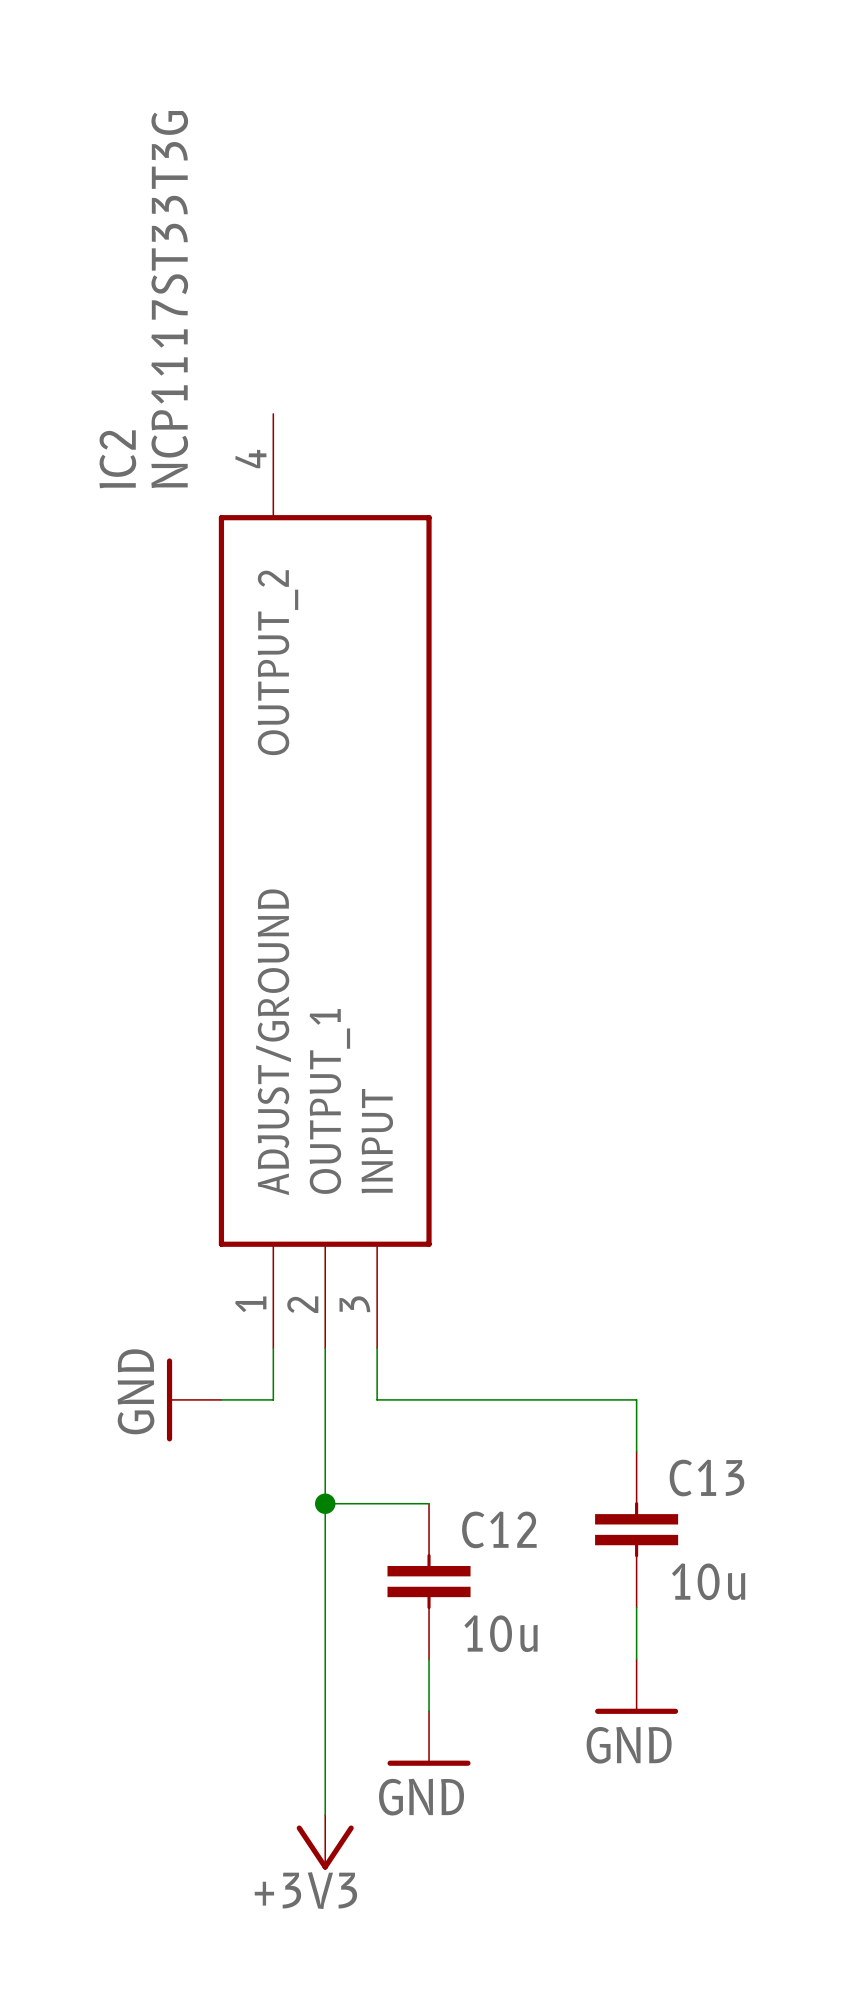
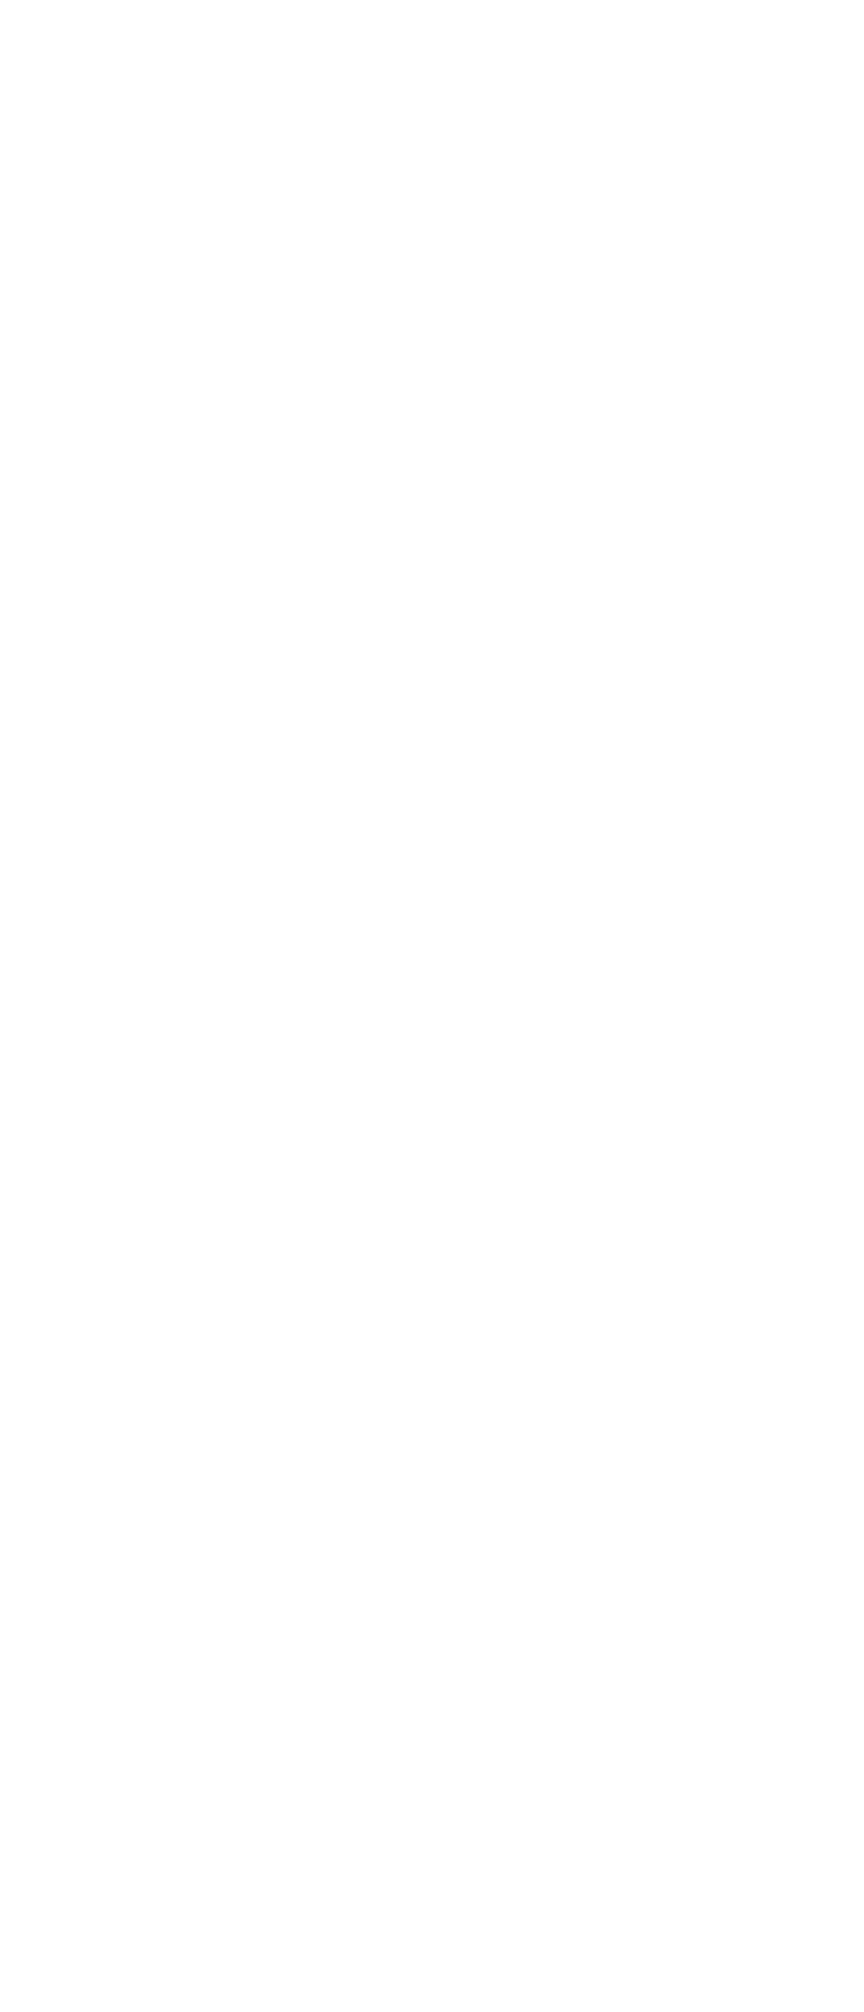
IC2: NCP1117ST33T3G (325, 880) -> none
wire: (273, 1348) (273, 1399) (221, 1399) -> none
wire: (325, 1348) (325, 1815) -> none
wire: (377, 1348) (377, 1399) (636, 1399) (636, 1451) -> none
power symbol: GND (194, 1399) -> none
wire: (325, 1503) (429, 1503) -> none
junction: (325, 1503) -> none
C13: 10u (636, 1529) -> none
C12: 10u (429, 1581) -> none
wire: (636, 1607) (636, 1659) -> none
wire: (429, 1659) (429, 1711) -> none
power symbol: GND (636, 1686) -> none
power symbol: GND (429, 1738) -> none
power symbol: +3V3 (325, 1842) -> none

